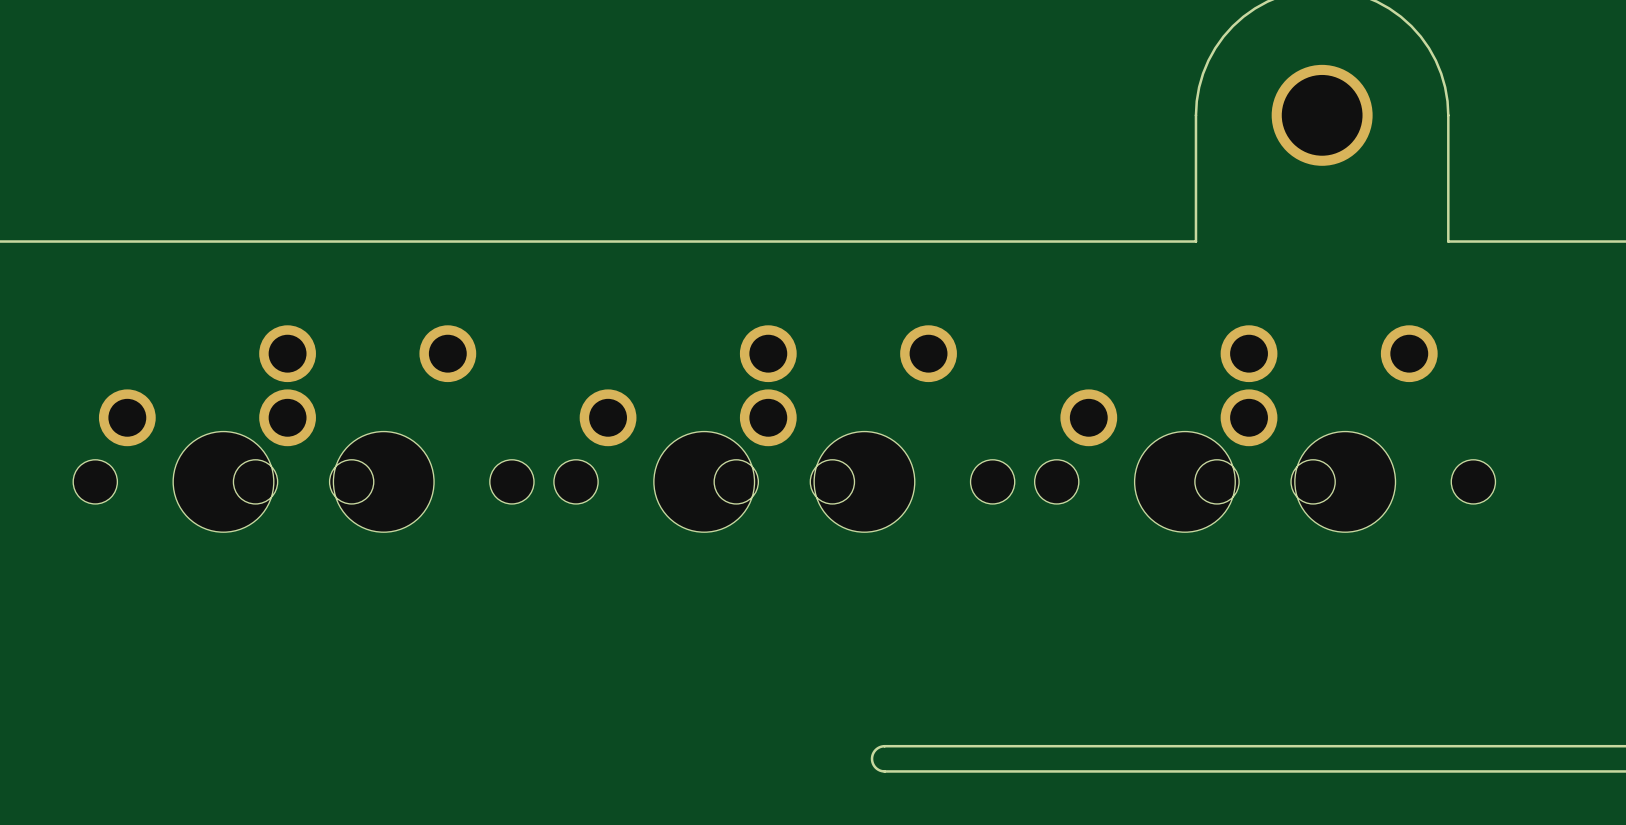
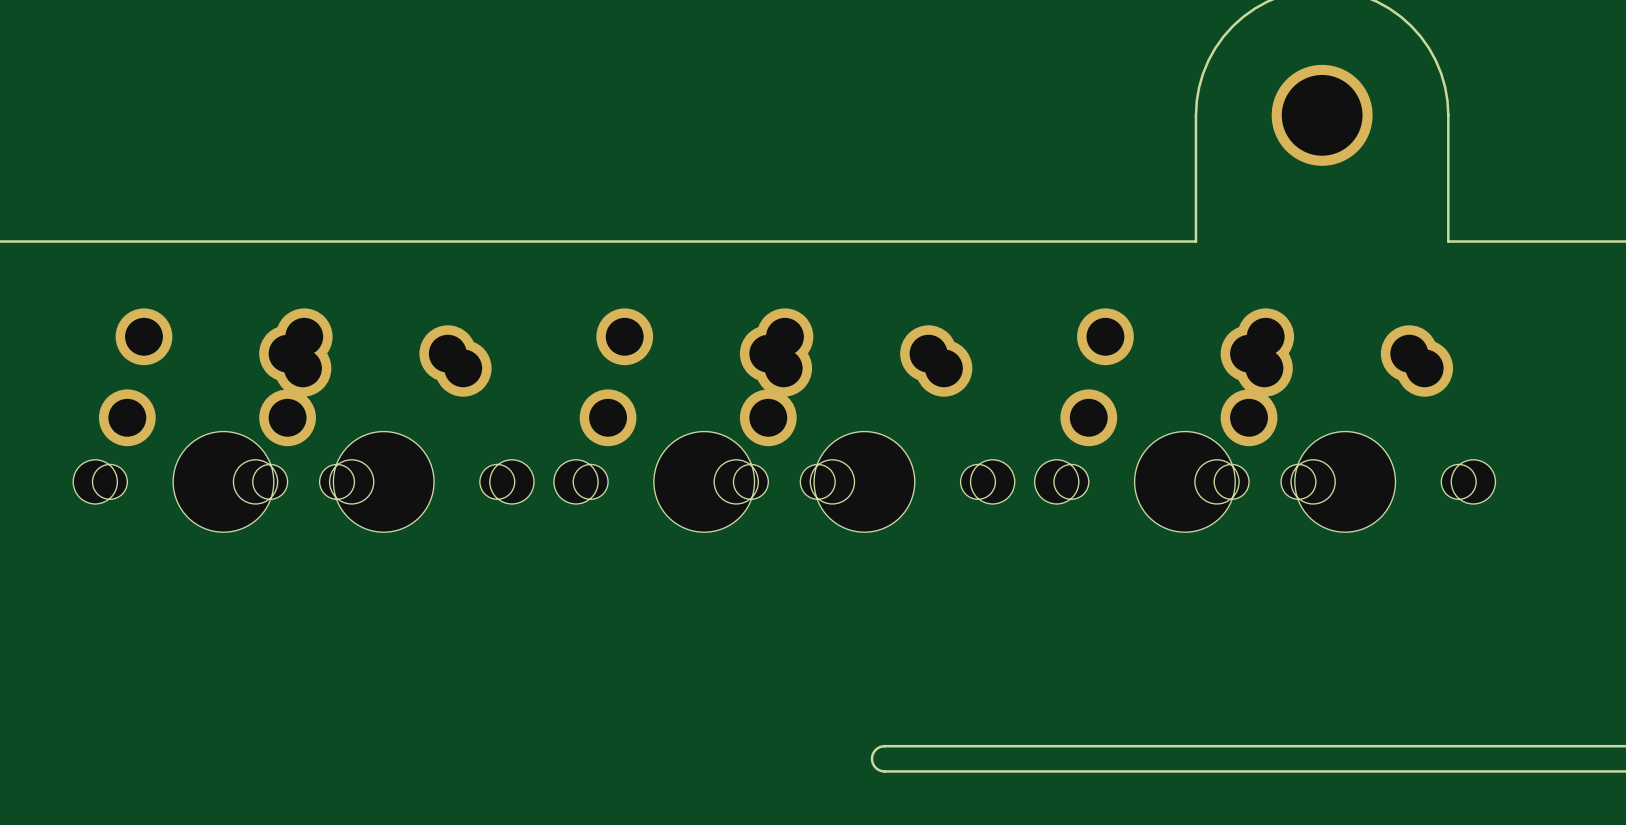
part footprint: [73, 325, 374, 533] -> [73, 308, 374, 533]
part footprint: [233, 325, 534, 533] -> [233, 308, 534, 533]
part footprint: [553, 325, 855, 533] -> [553, 308, 855, 533]
part footprint: [714, 325, 1015, 533] -> [714, 308, 1015, 533]
part footprint: [1034, 325, 1336, 533] -> [1034, 308, 1336, 533]
part footprint: [1194, 325, 1496, 533] -> [1194, 308, 1496, 533]

